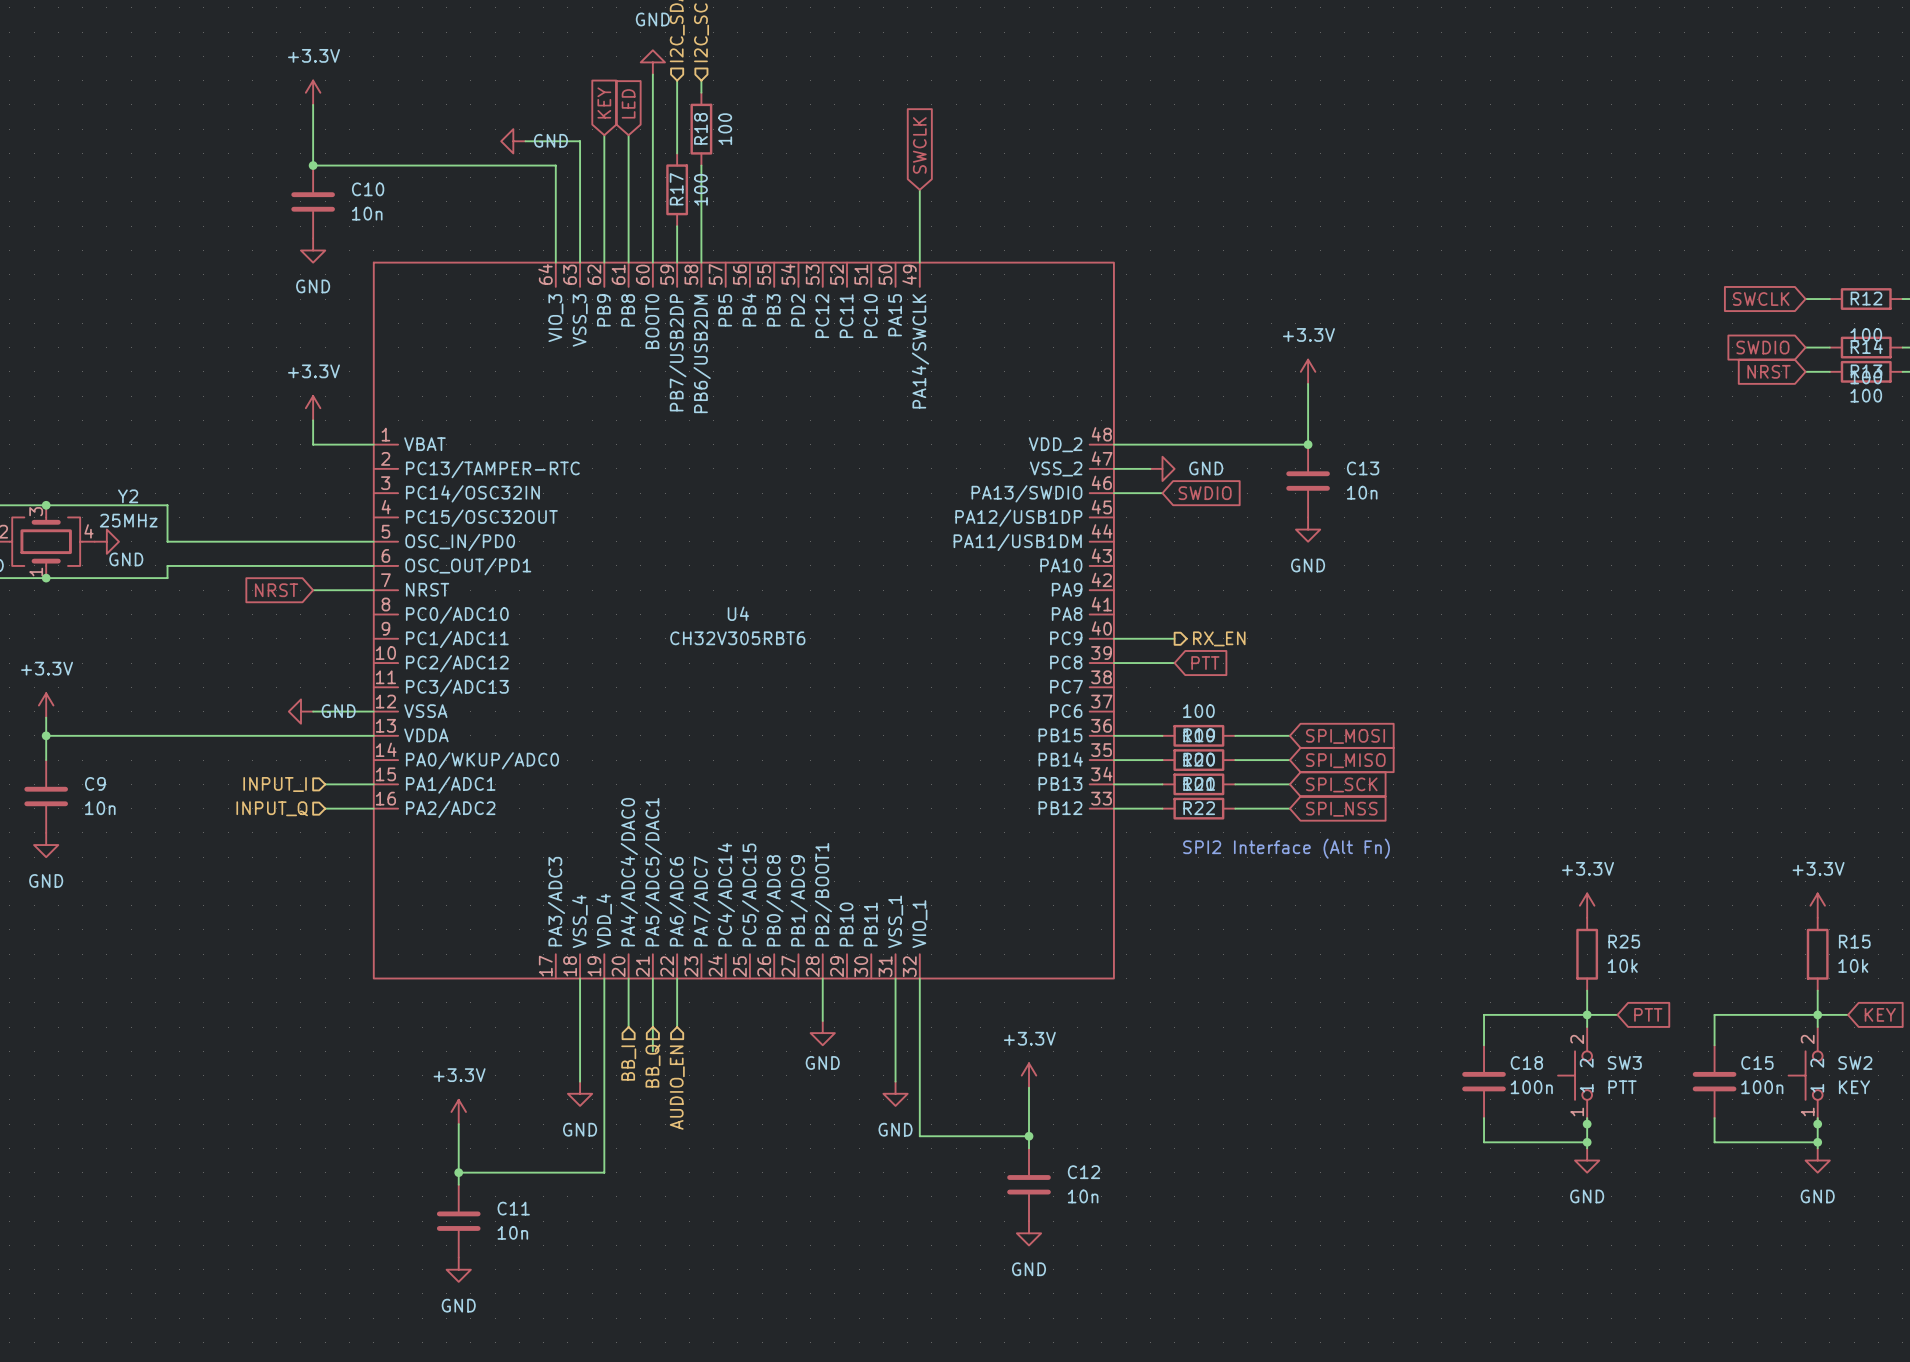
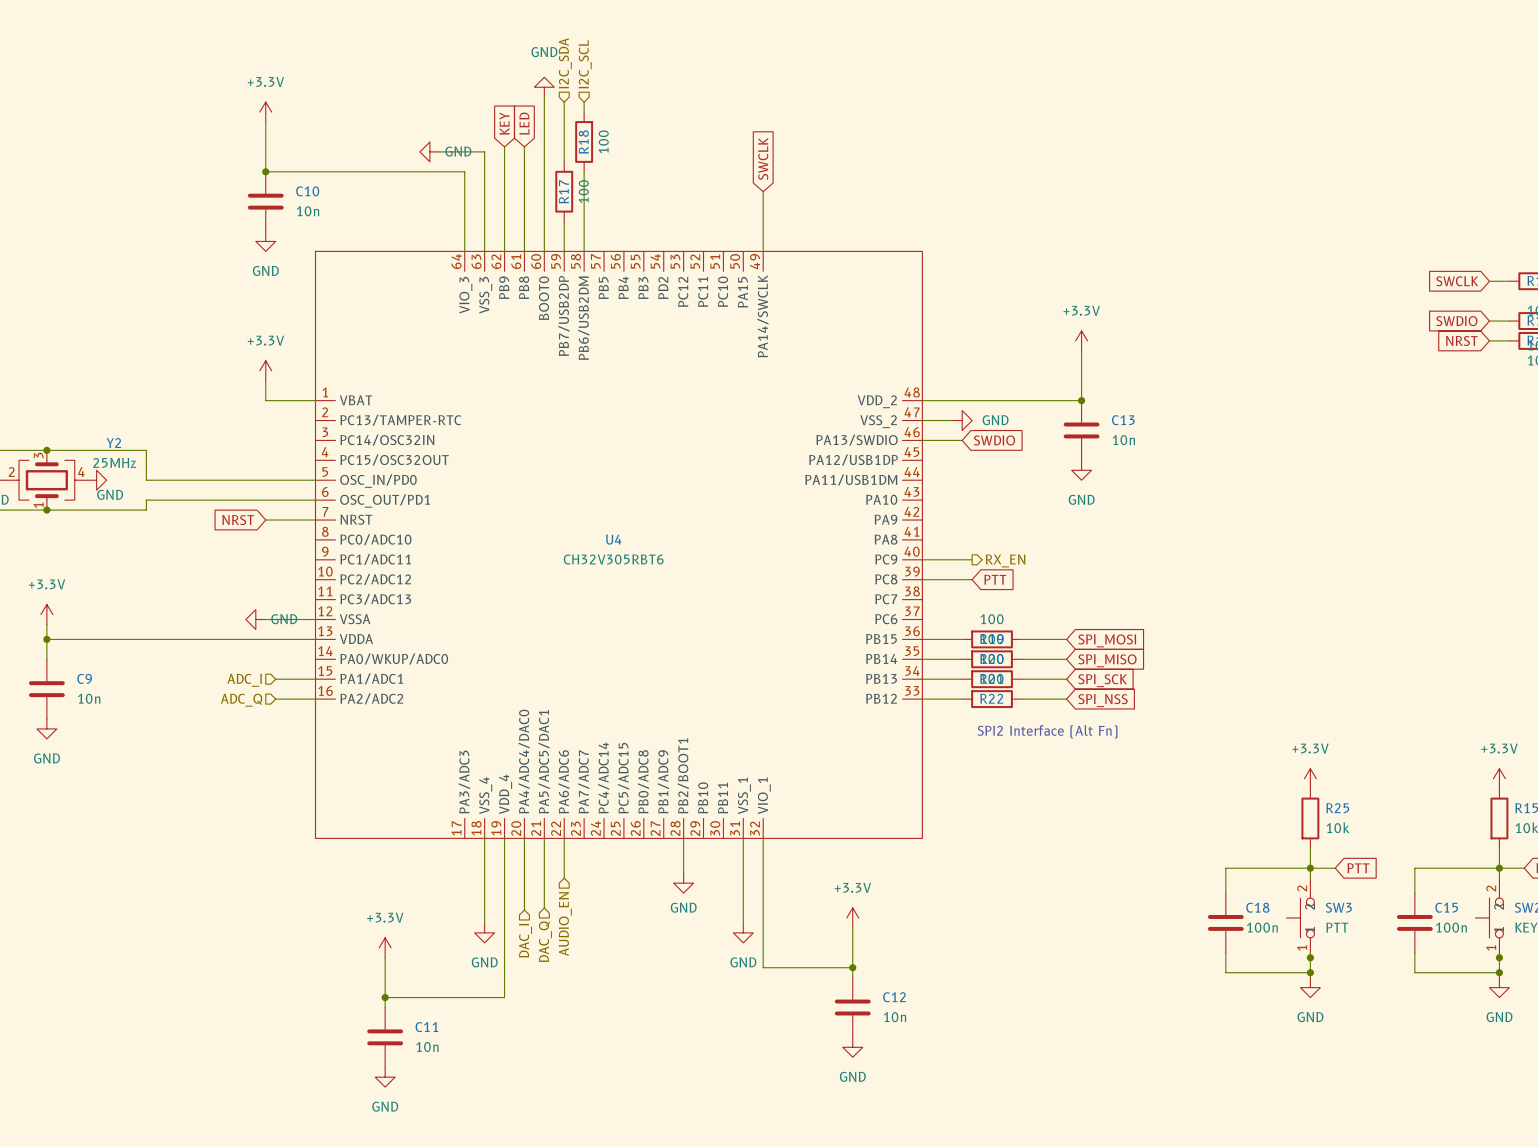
hierarchical label: INPUT_I (275, 784) -> ADC_I (244, 680)
hierarchical label: INPUT_Q (272, 808) -> ADC_Q (241, 700)
wire: none -> (524, 878) (524, 910)
wire: none -> (544, 898) (544, 908)
hierarchical label: BB_I (628, 1063) -> none
hierarchical label: BB_Q (652, 1065) -> none
hierarchical label: none -> DAC_I (525, 940)
hierarchical label: none -> DAC_Q (545, 941)

